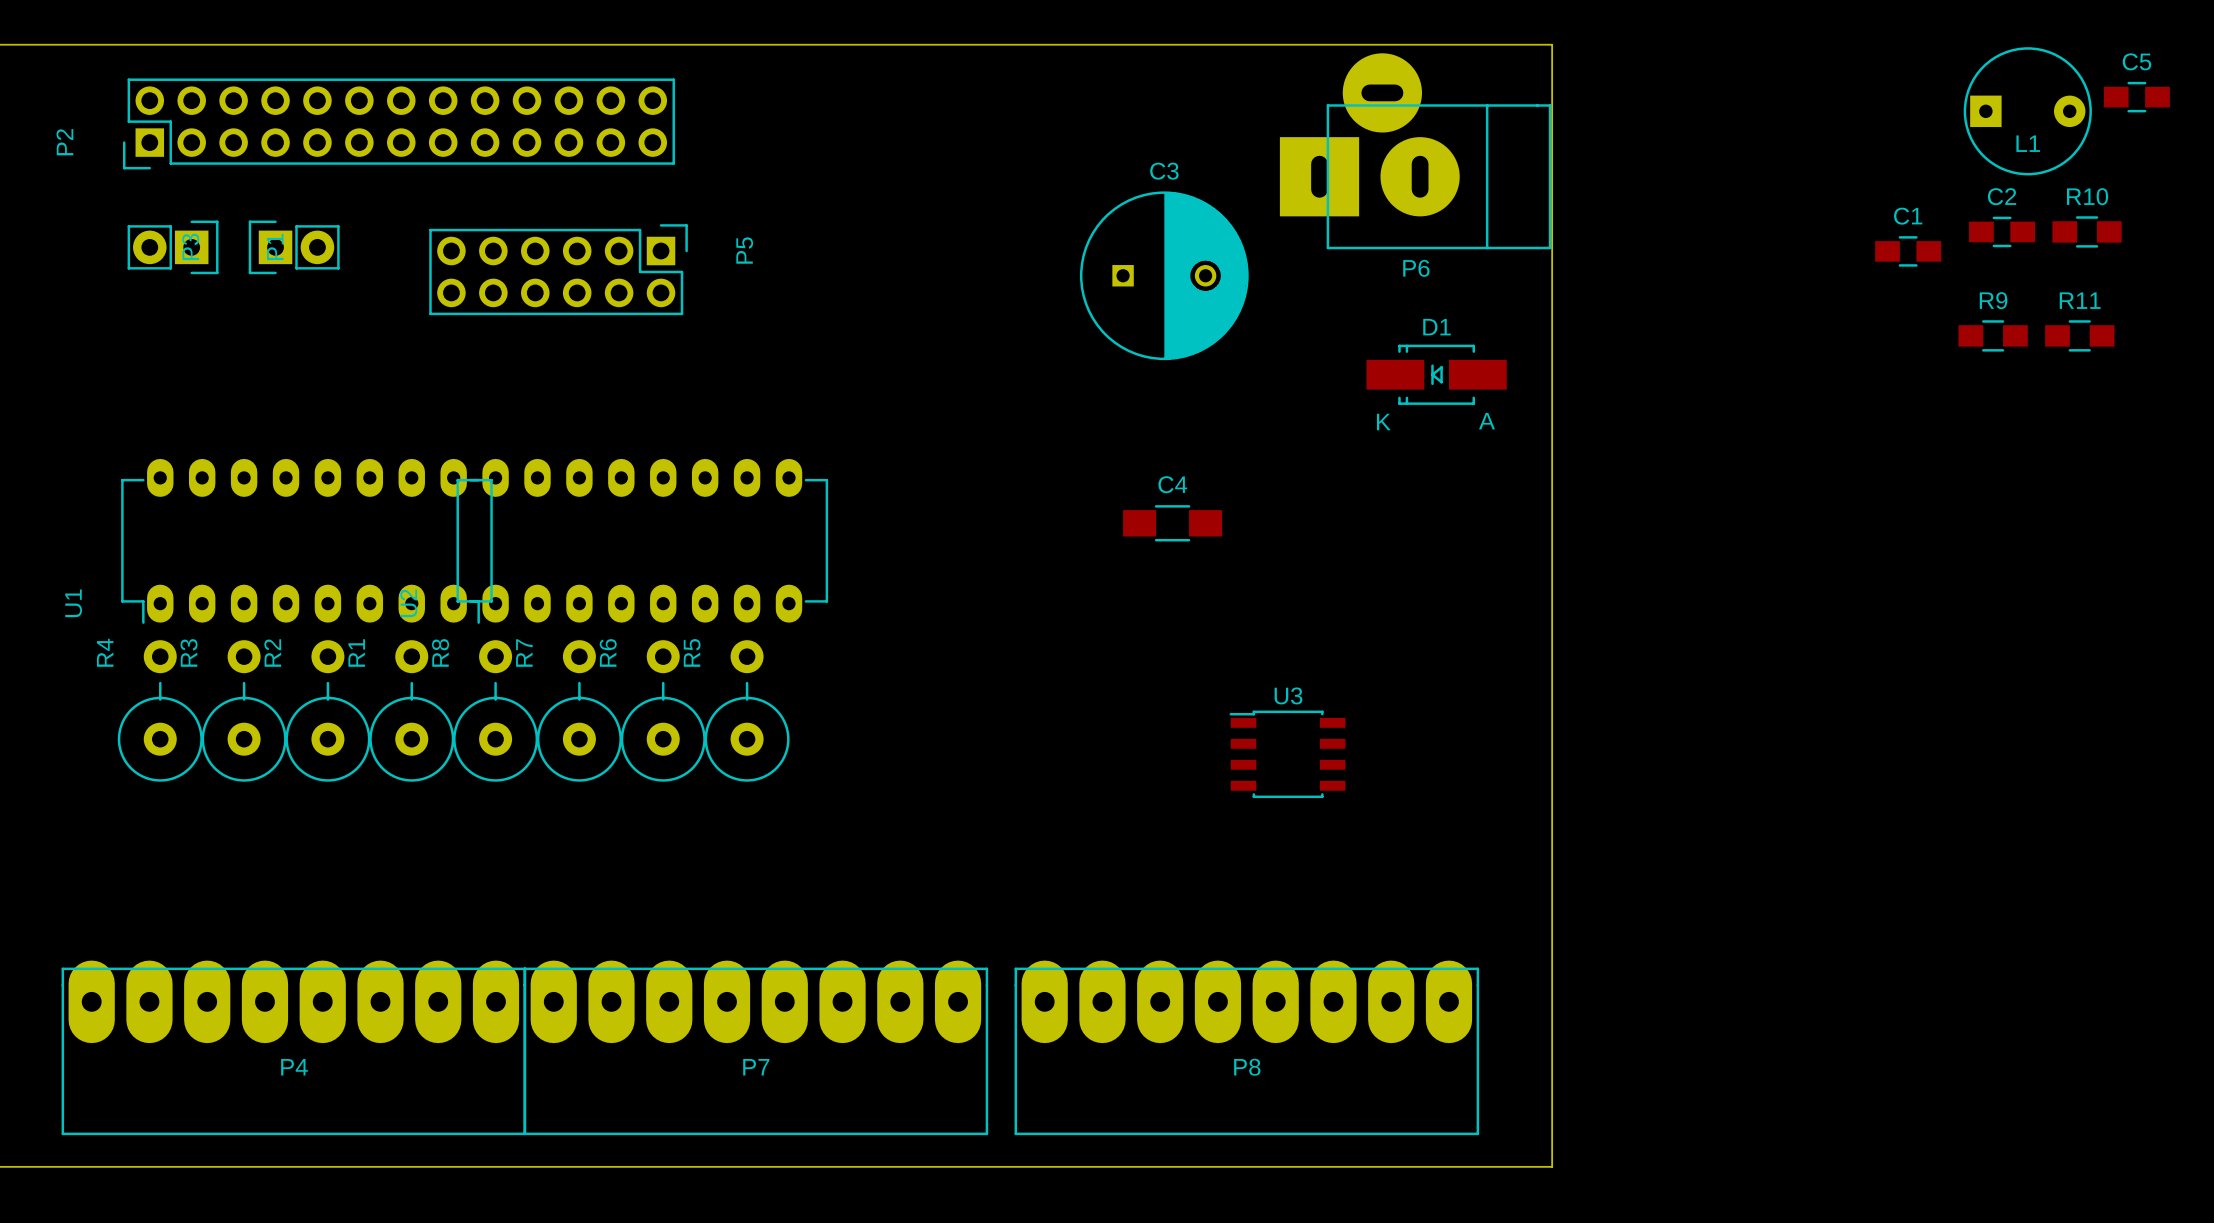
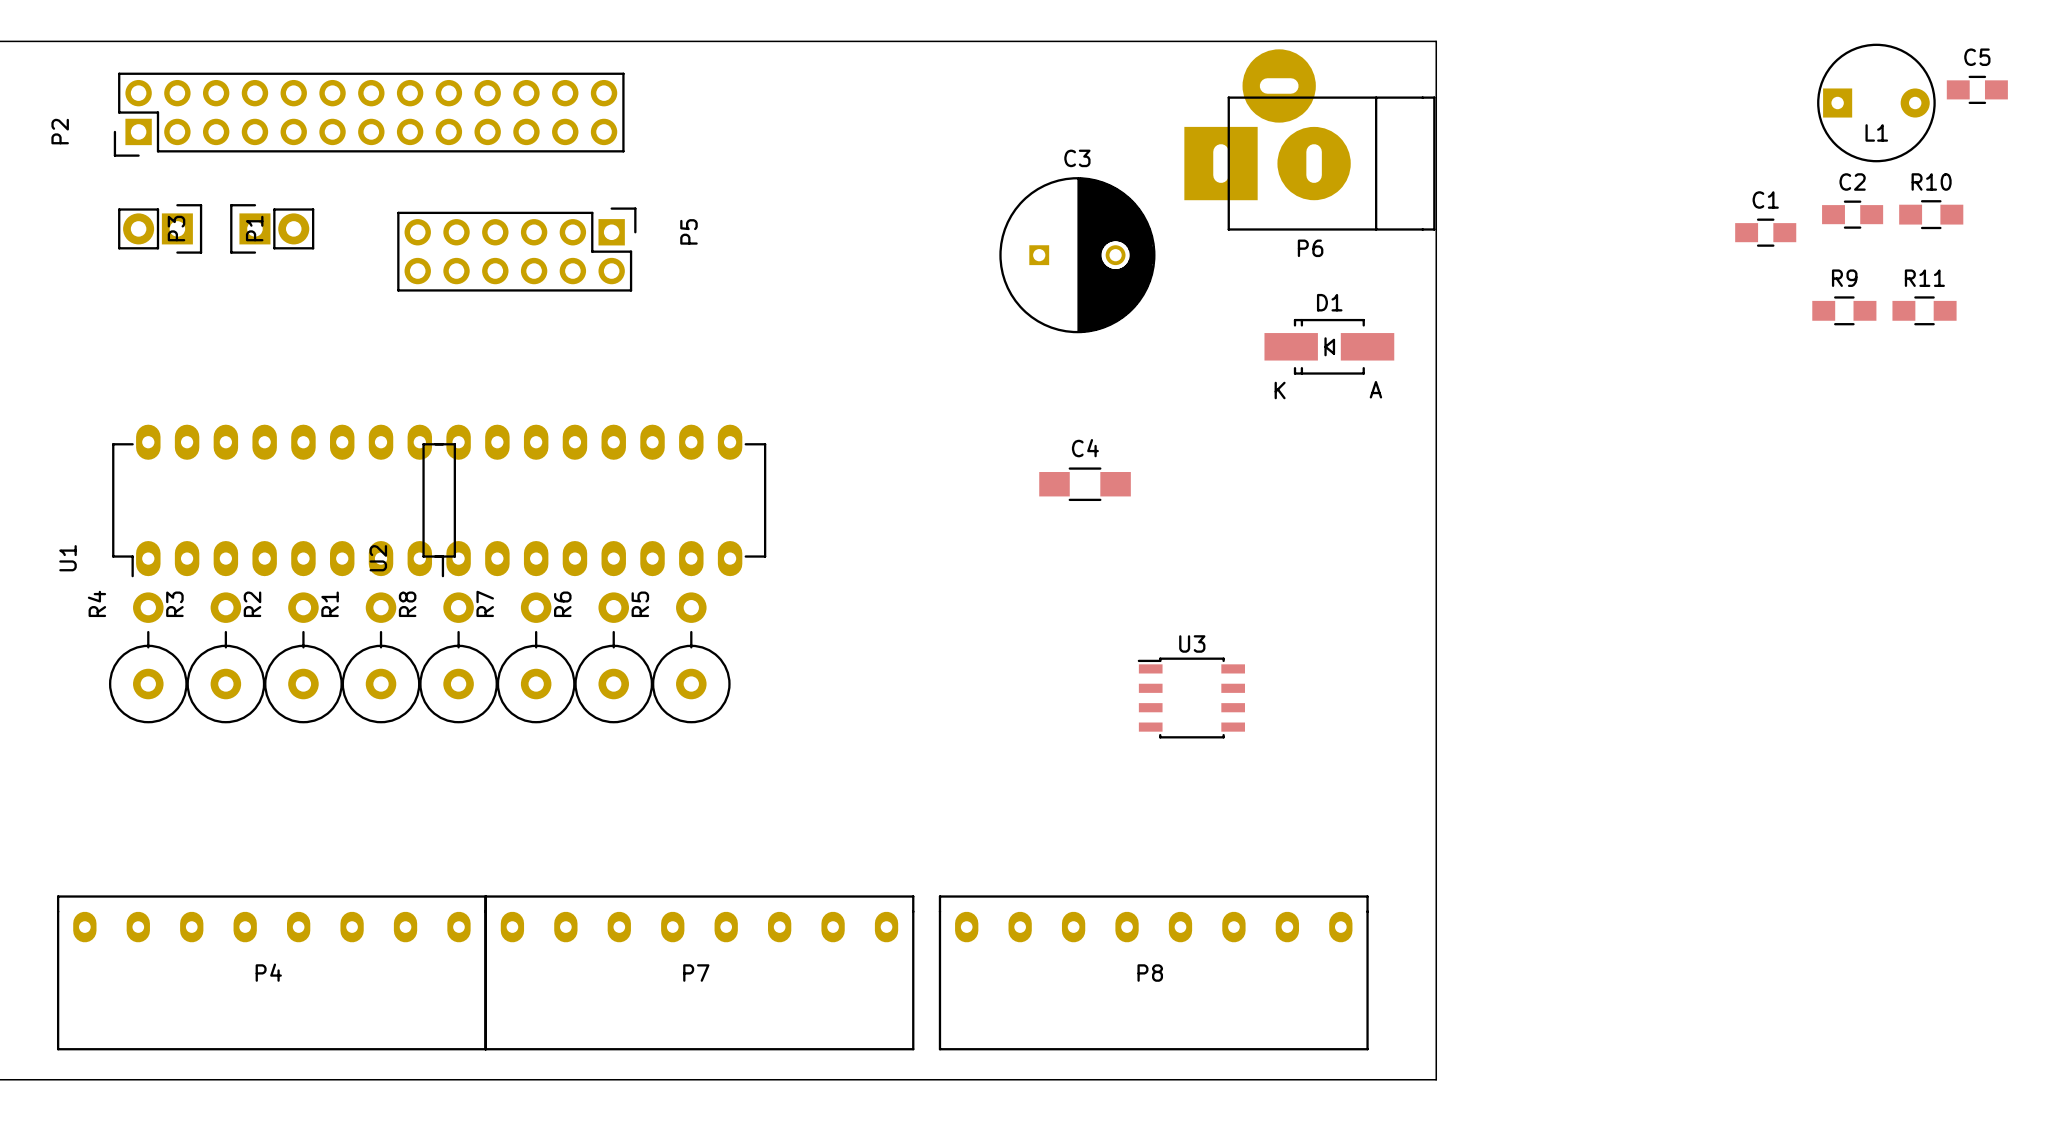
P4 footprint: [61, 960, 527, 1136] -> [56, 895, 487, 1051]
P7 footprint: [523, 960, 989, 1136] -> [484, 895, 915, 1051]
P8 footprint: [1014, 960, 1480, 1136] -> [938, 895, 1369, 1051]

